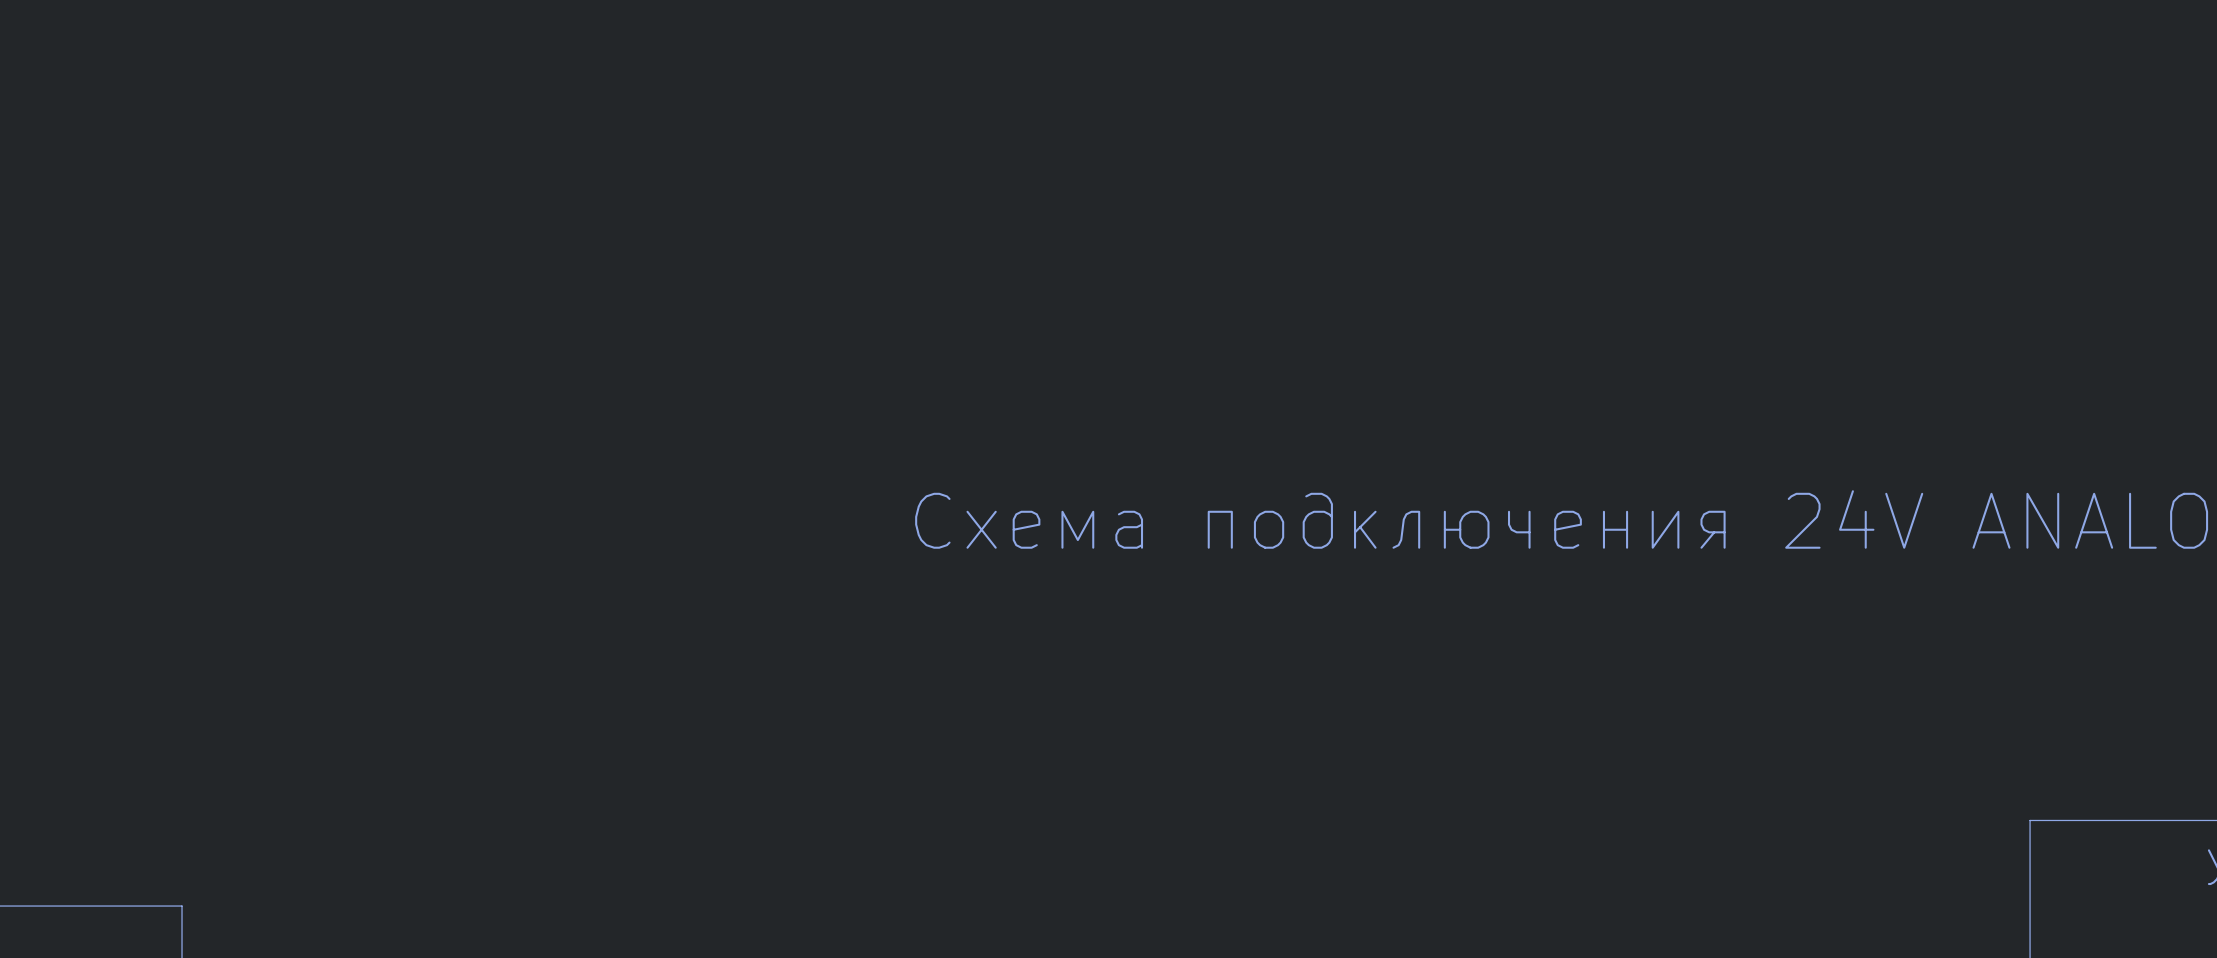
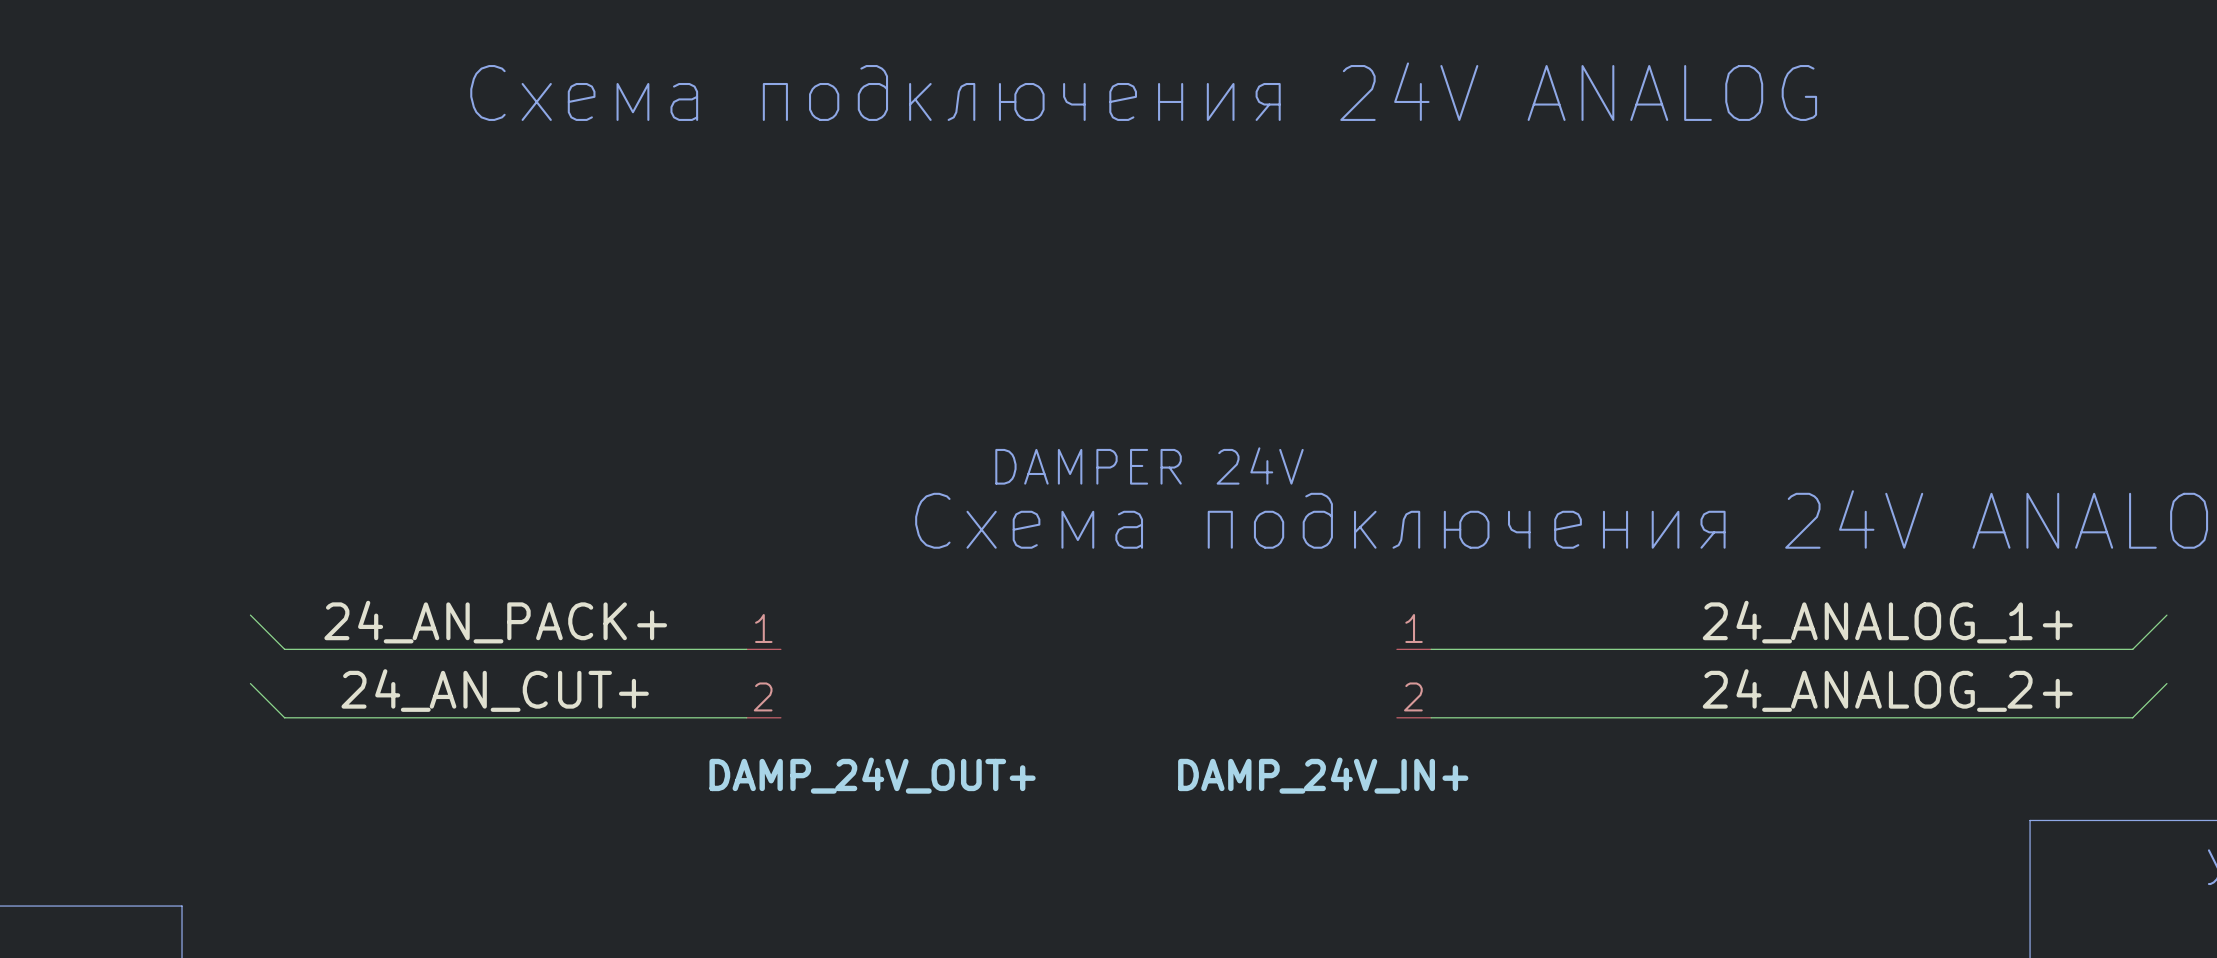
text: none -> Схема подключения 24V ANALOG (1143, 91)
text: none -> DAMPER 24V (1149, 465)
wire: none -> (250, 615) (284, 649) (746, 649)
wire: none -> (2166, 615) (2132, 649) (1431, 649)
label: none -> 24_AN_PACK+ (495, 622)
label: none -> 24_ANALOG_1+ (1887, 622)
wire: none -> (250, 683) (284, 717) (746, 717)
DAMP_24V_OUT+: none -> (763, 683)
DAMP_24V_IN+: none -> (1414, 683)
wire: none -> (2166, 683) (2132, 717) (1431, 717)
label: none -> 24_AN_CUT+ (495, 690)
label: none -> 24_ANALOG_2+ (1887, 690)

